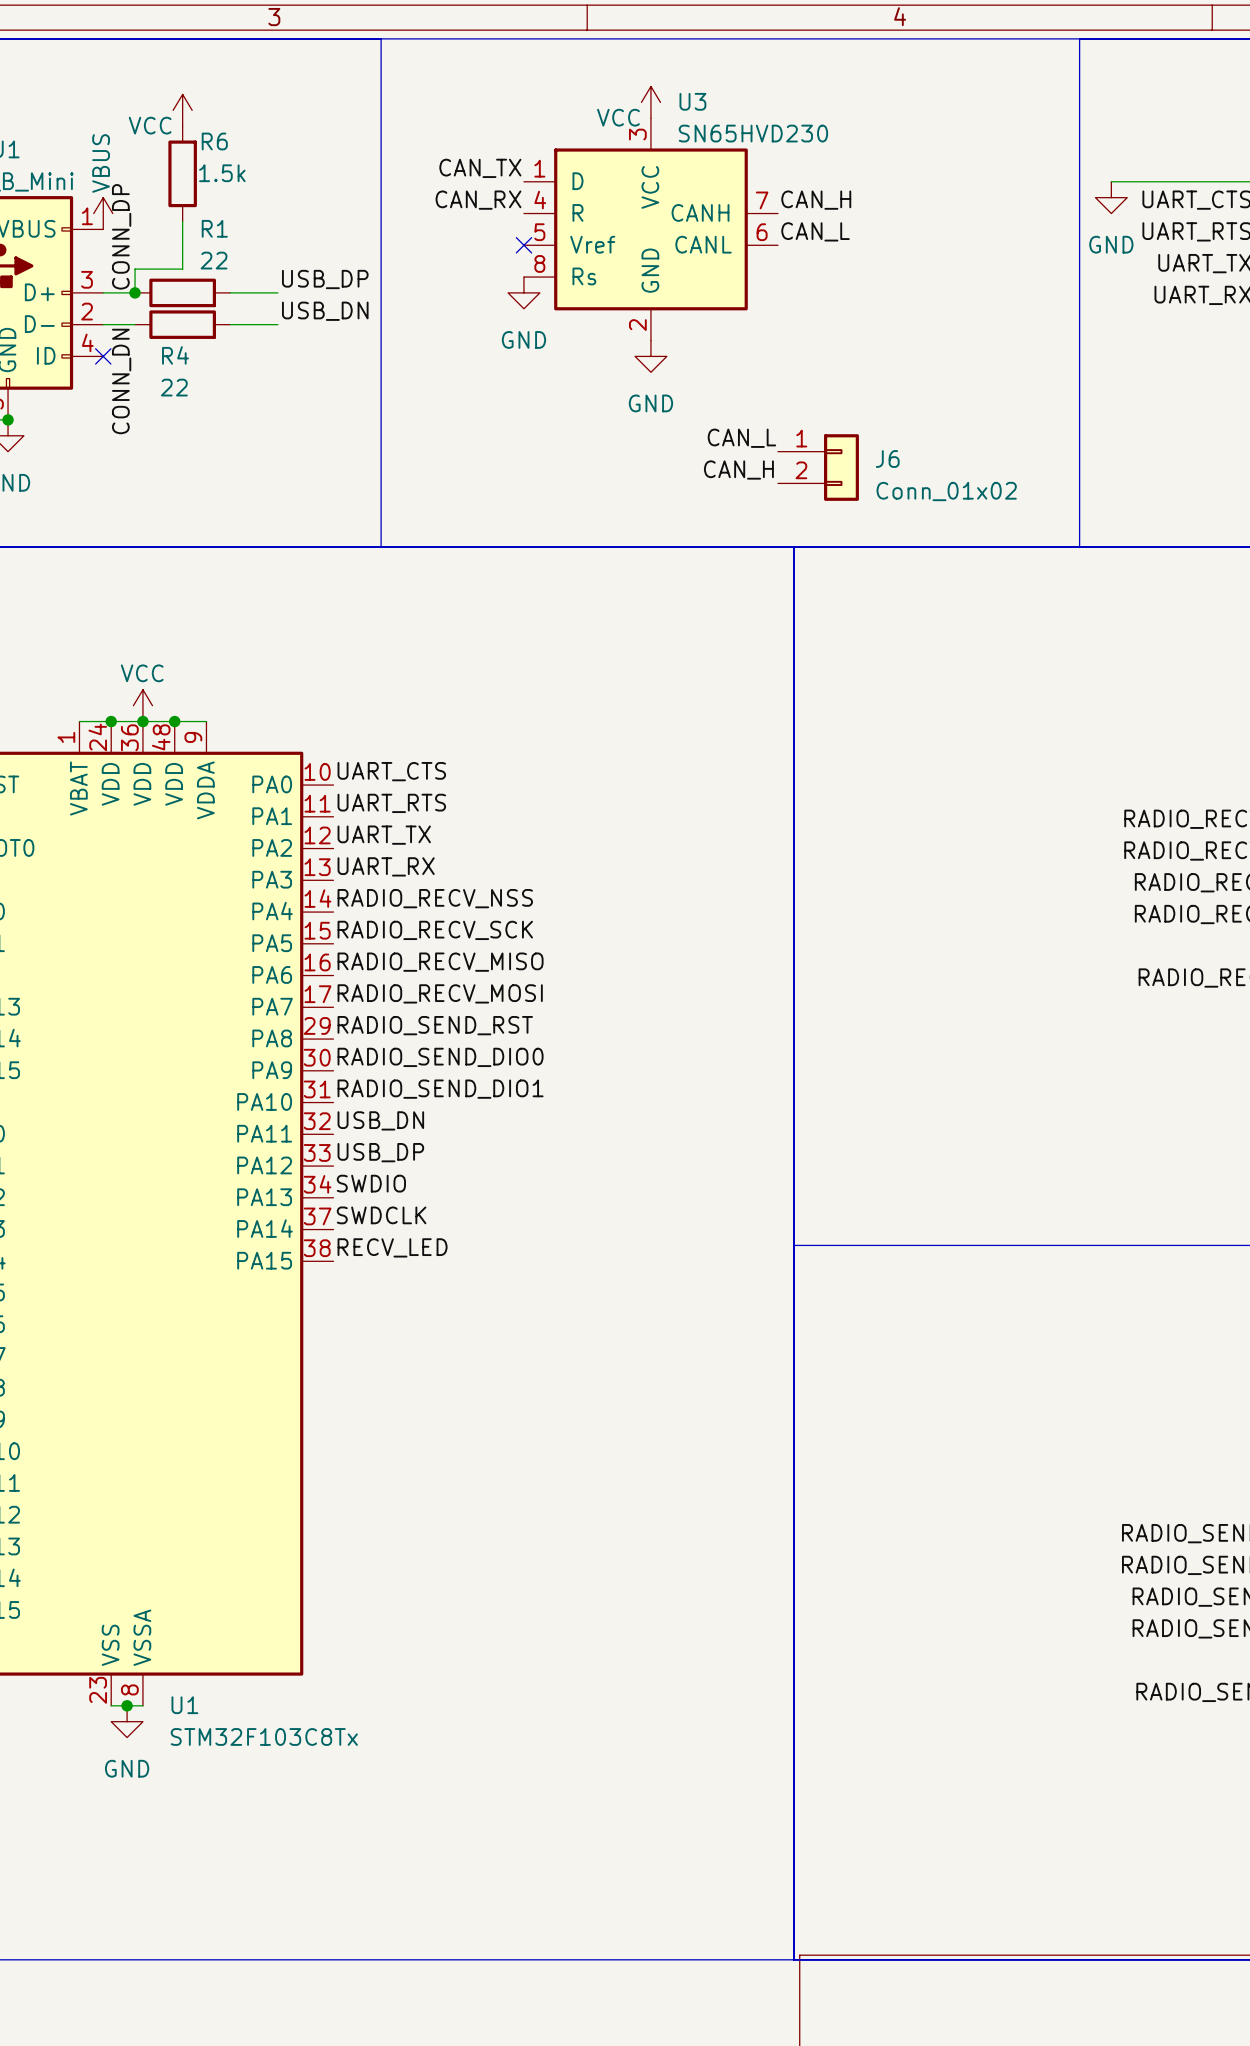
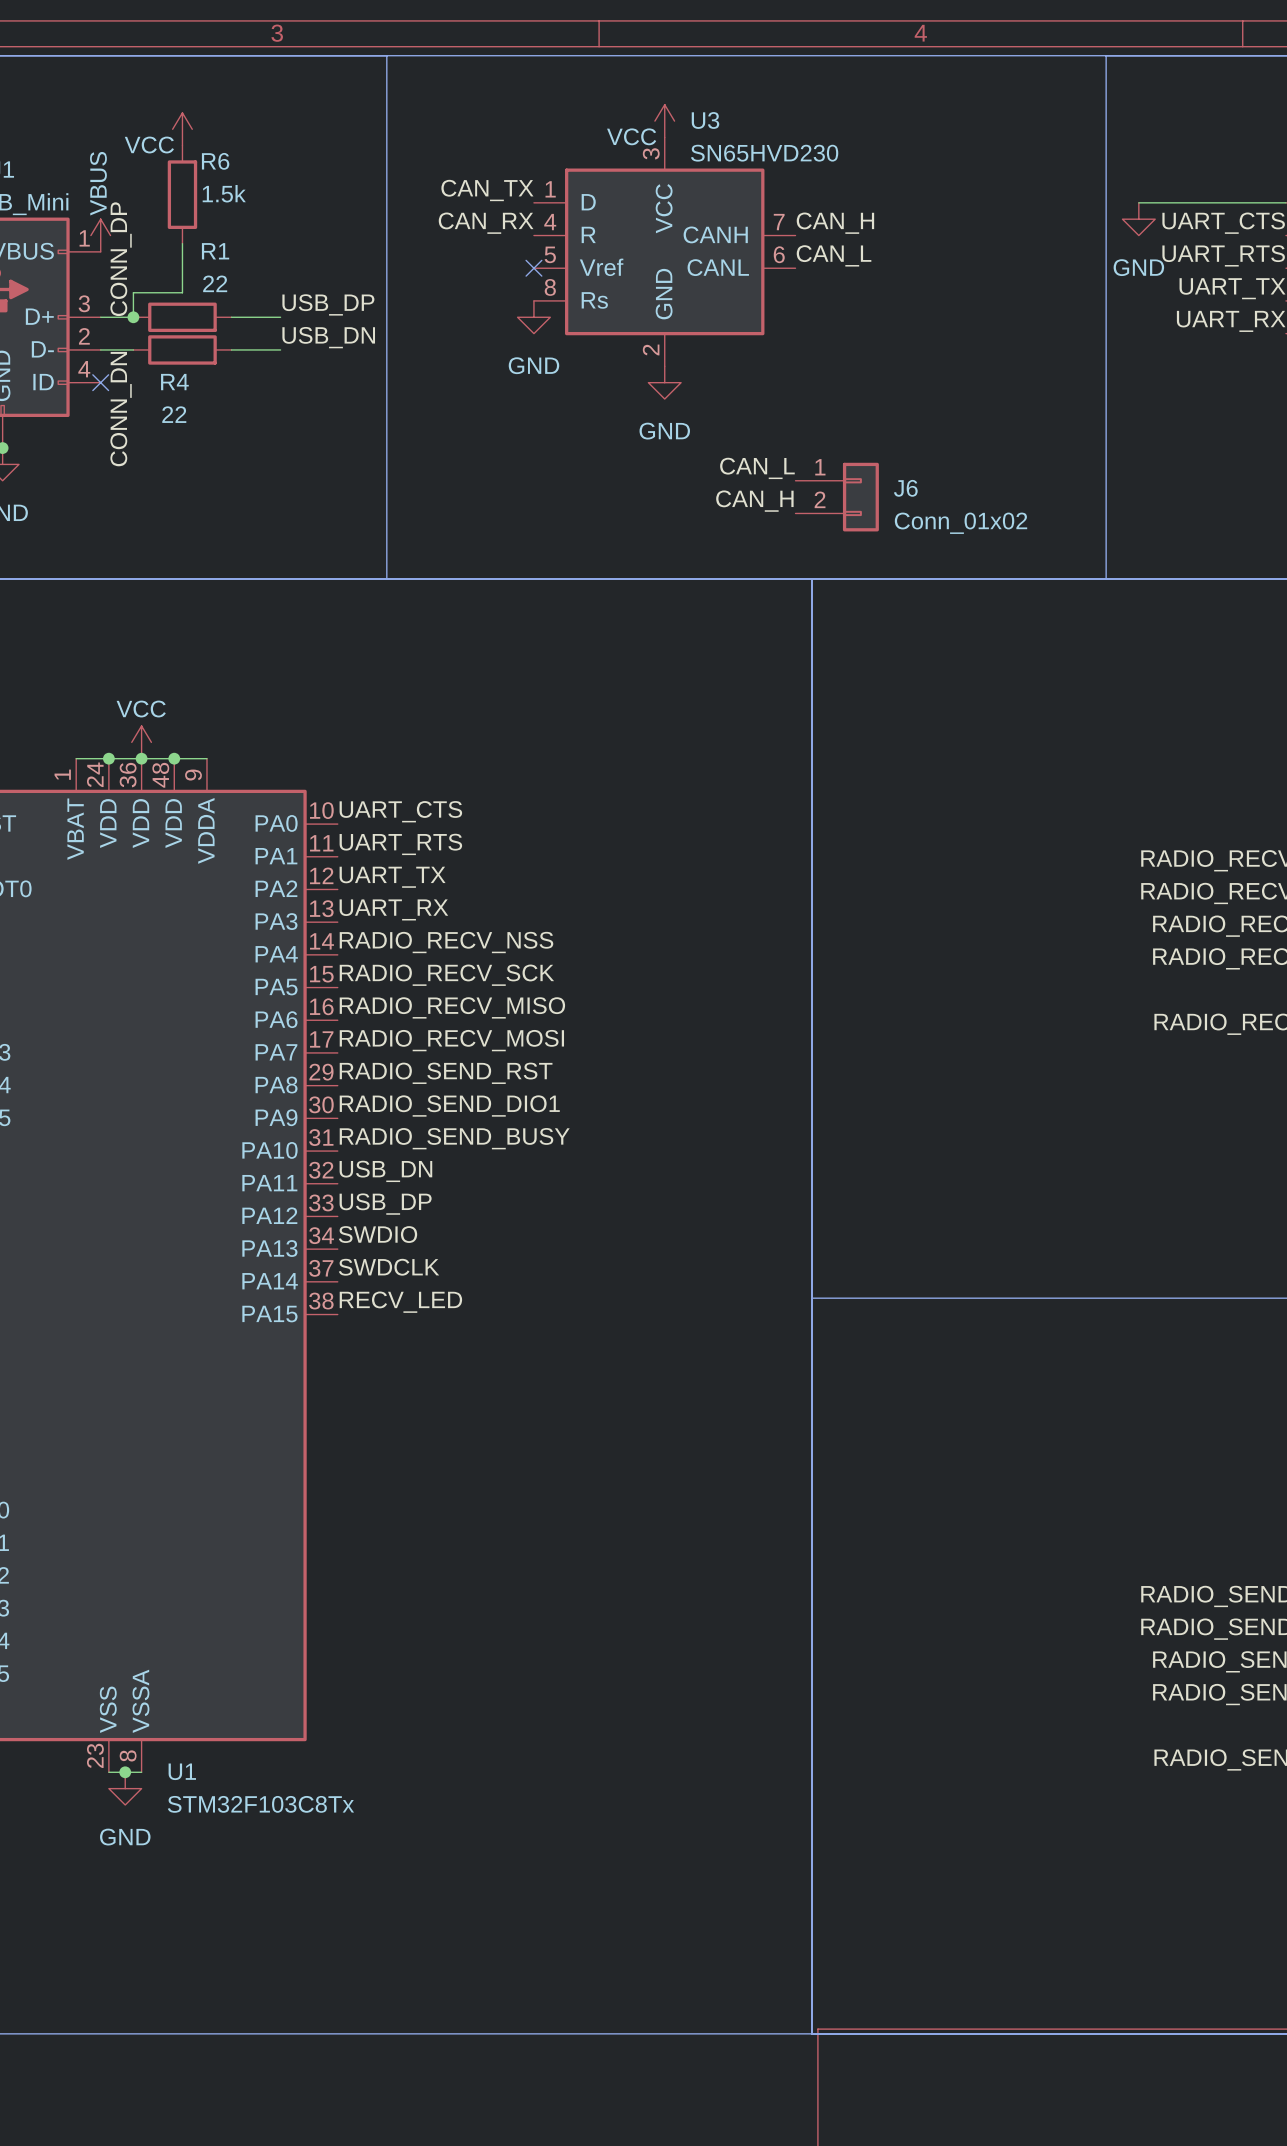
label: RADIO_SEND_DIO0 (440, 1057) -> RADIO_SEND_DIO1 (449, 1106)
label: RADIO_SEND_DIO1 (440, 1089) -> RADIO_SEND_BUSY (454, 1138)

